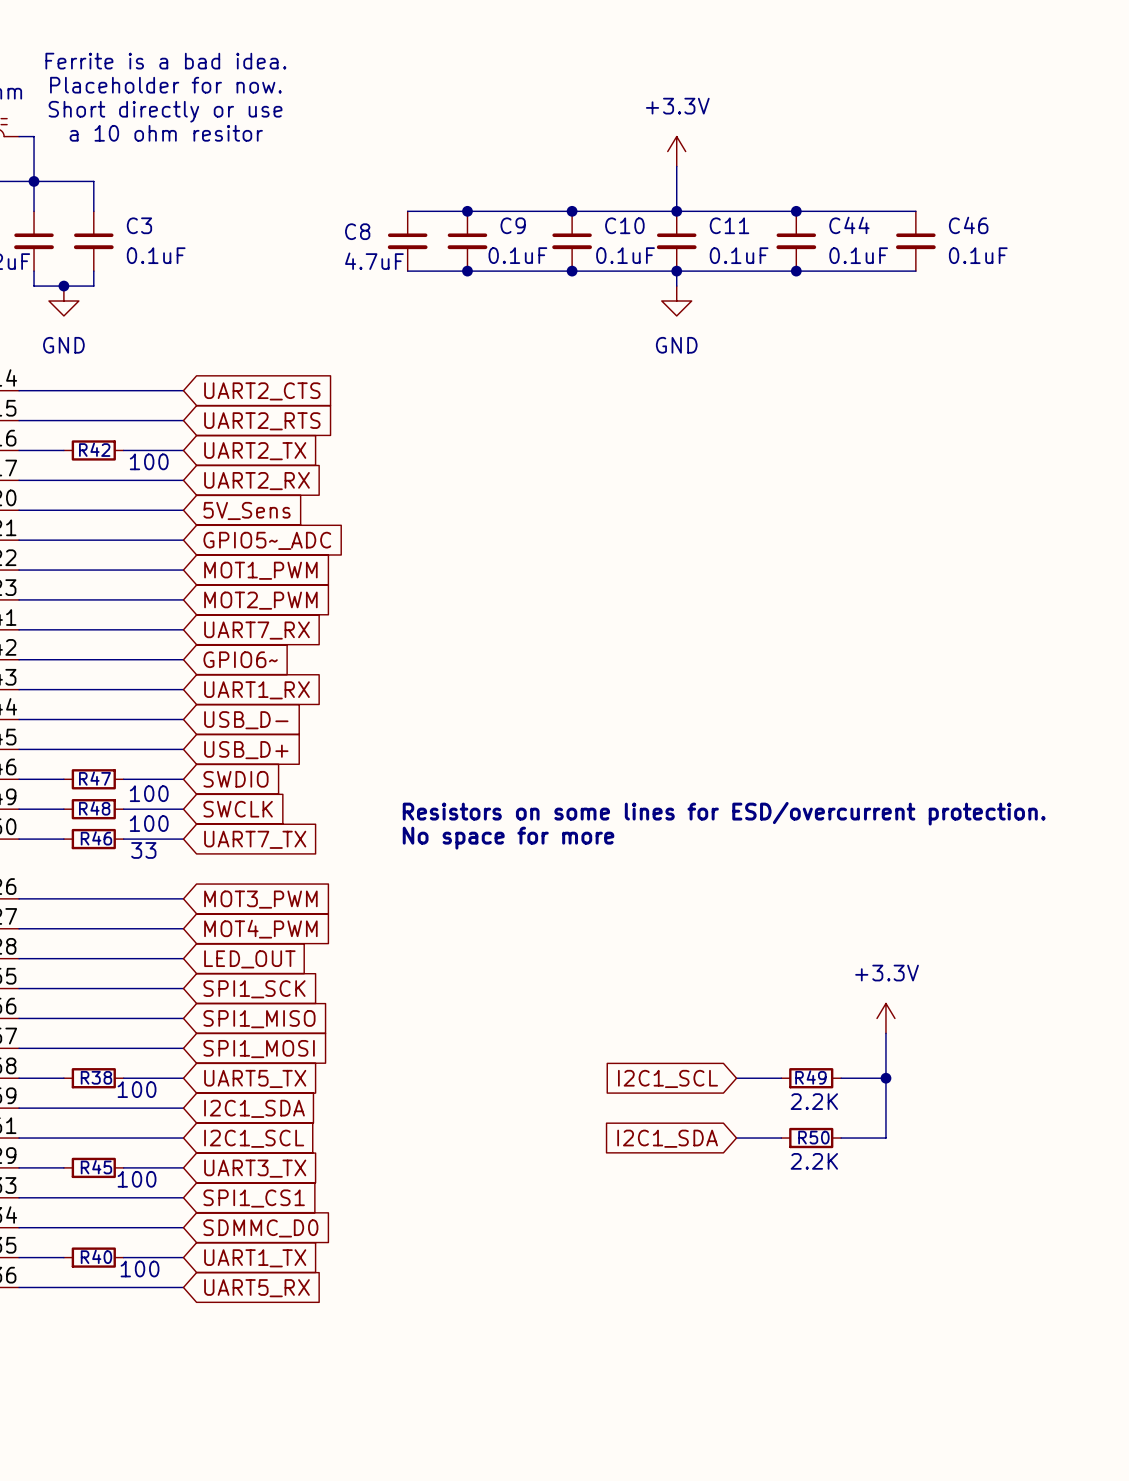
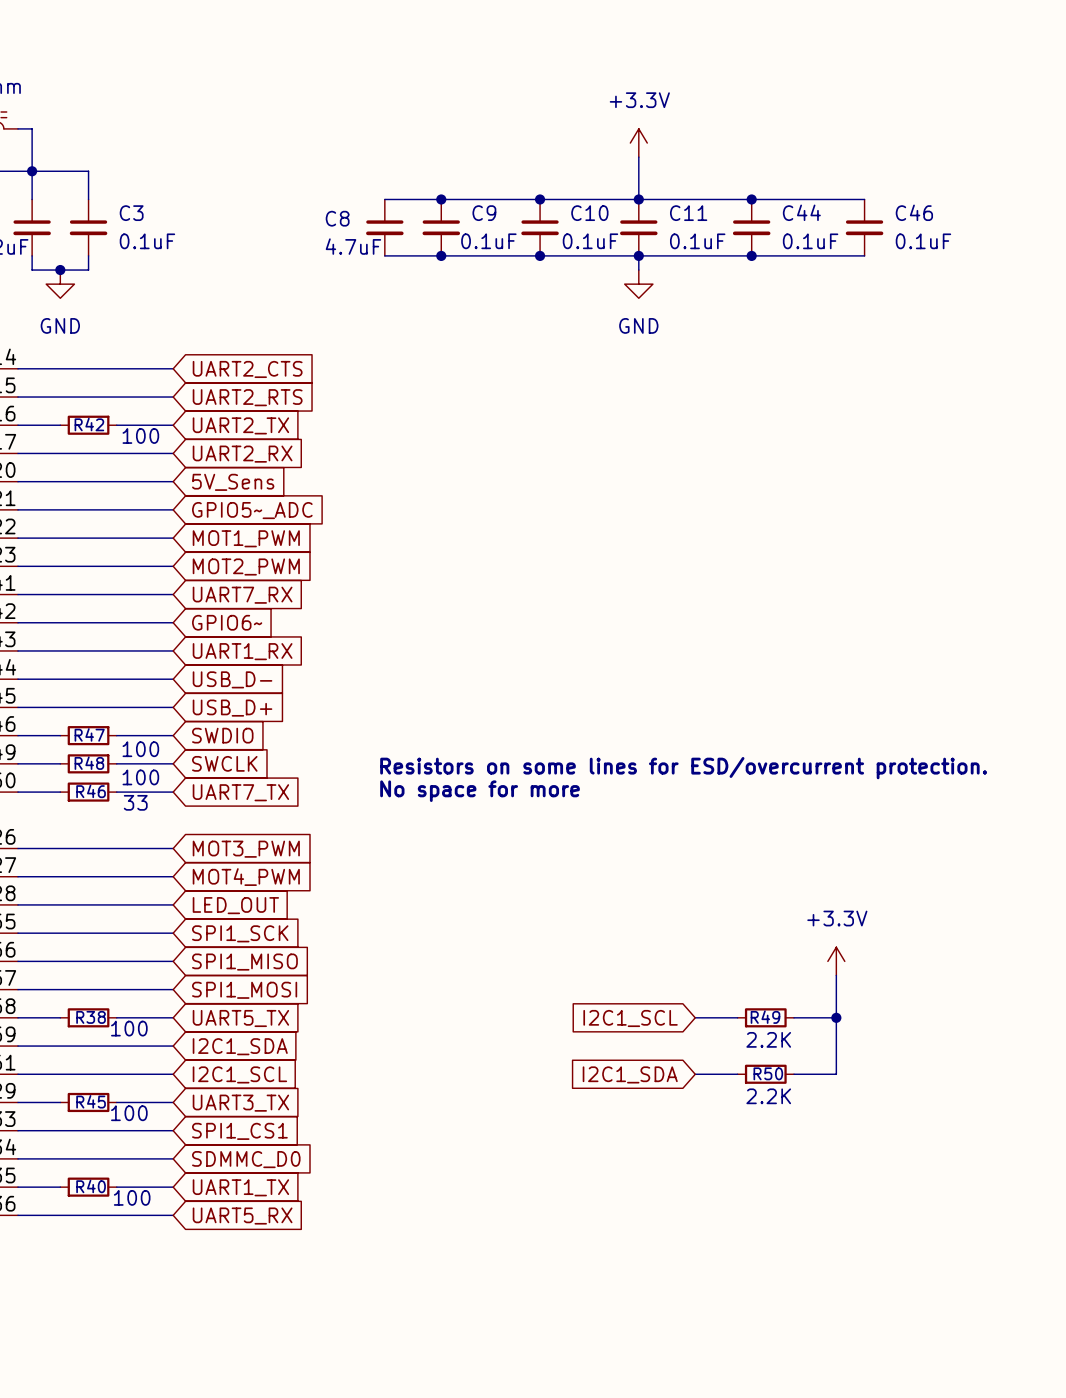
text: Ferrite is a bad idea. (165, 61) -> none
text: Placeholder for now. (165, 85) -> none
text: Short directly or use (165, 111) -> none
text: a 10 ohm resitor (166, 133) -> none

